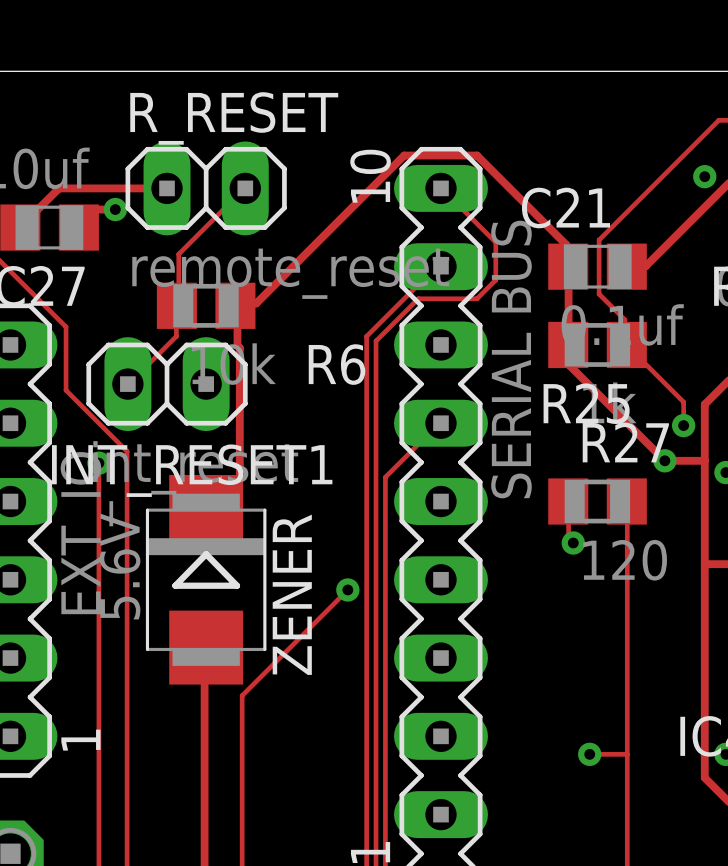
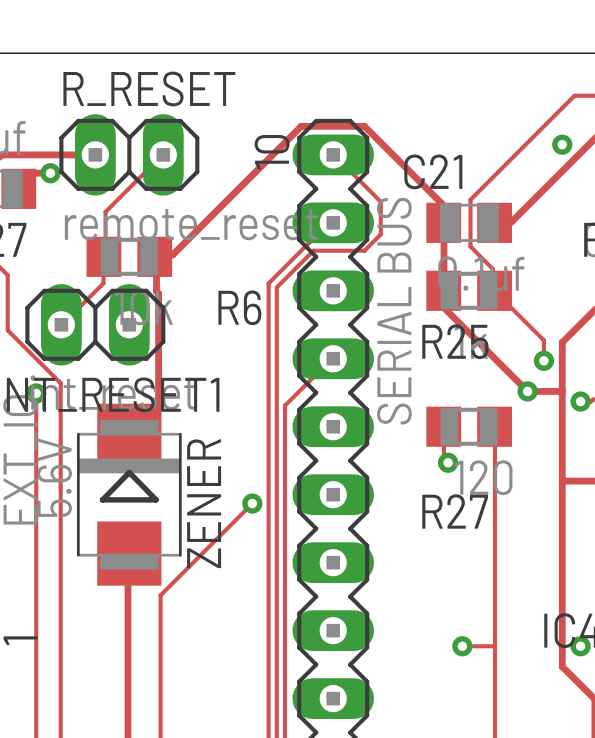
R27 name position: R27 (625, 442) -> R27 (455, 511)

